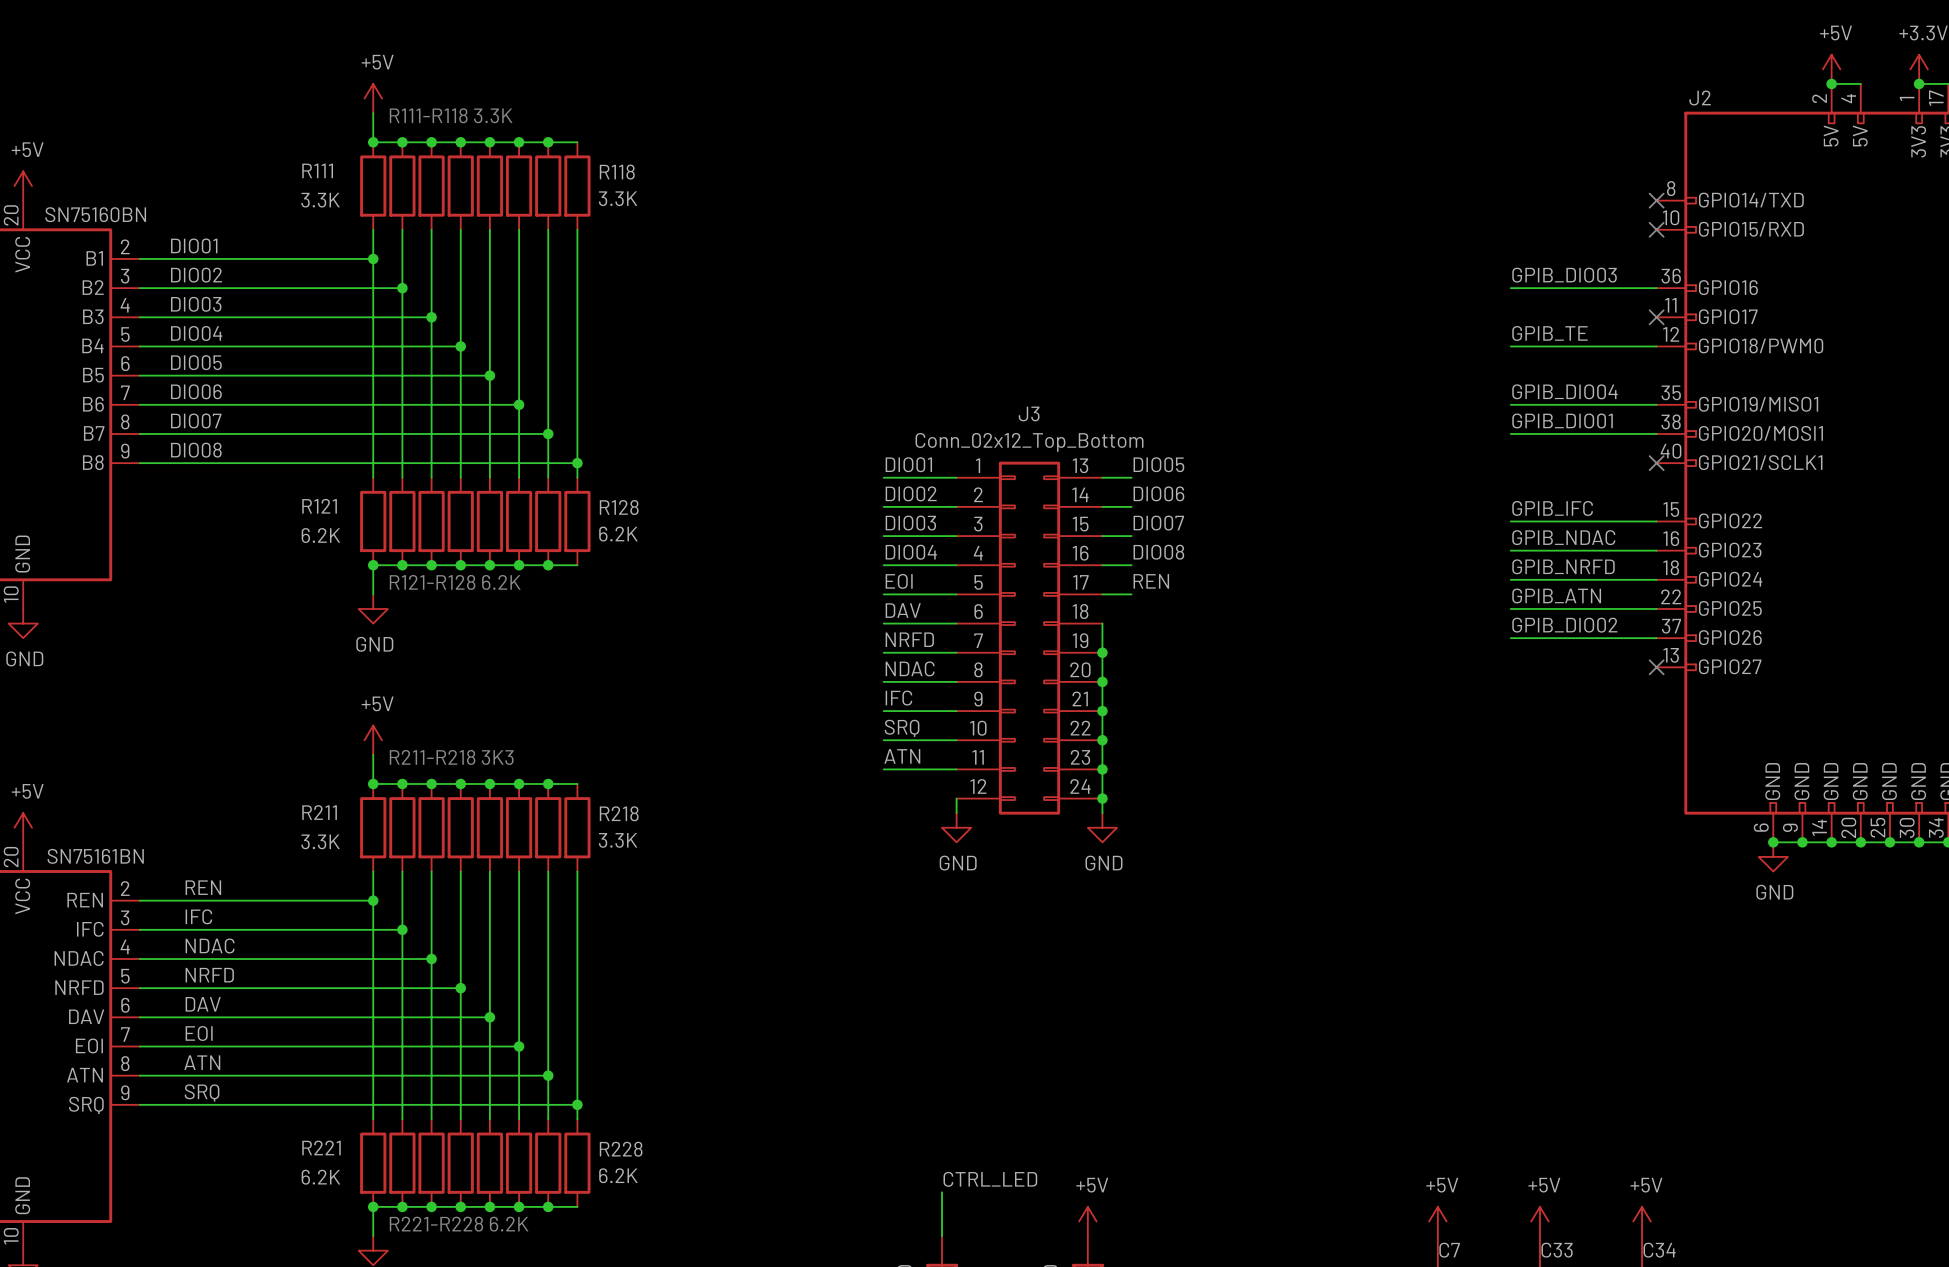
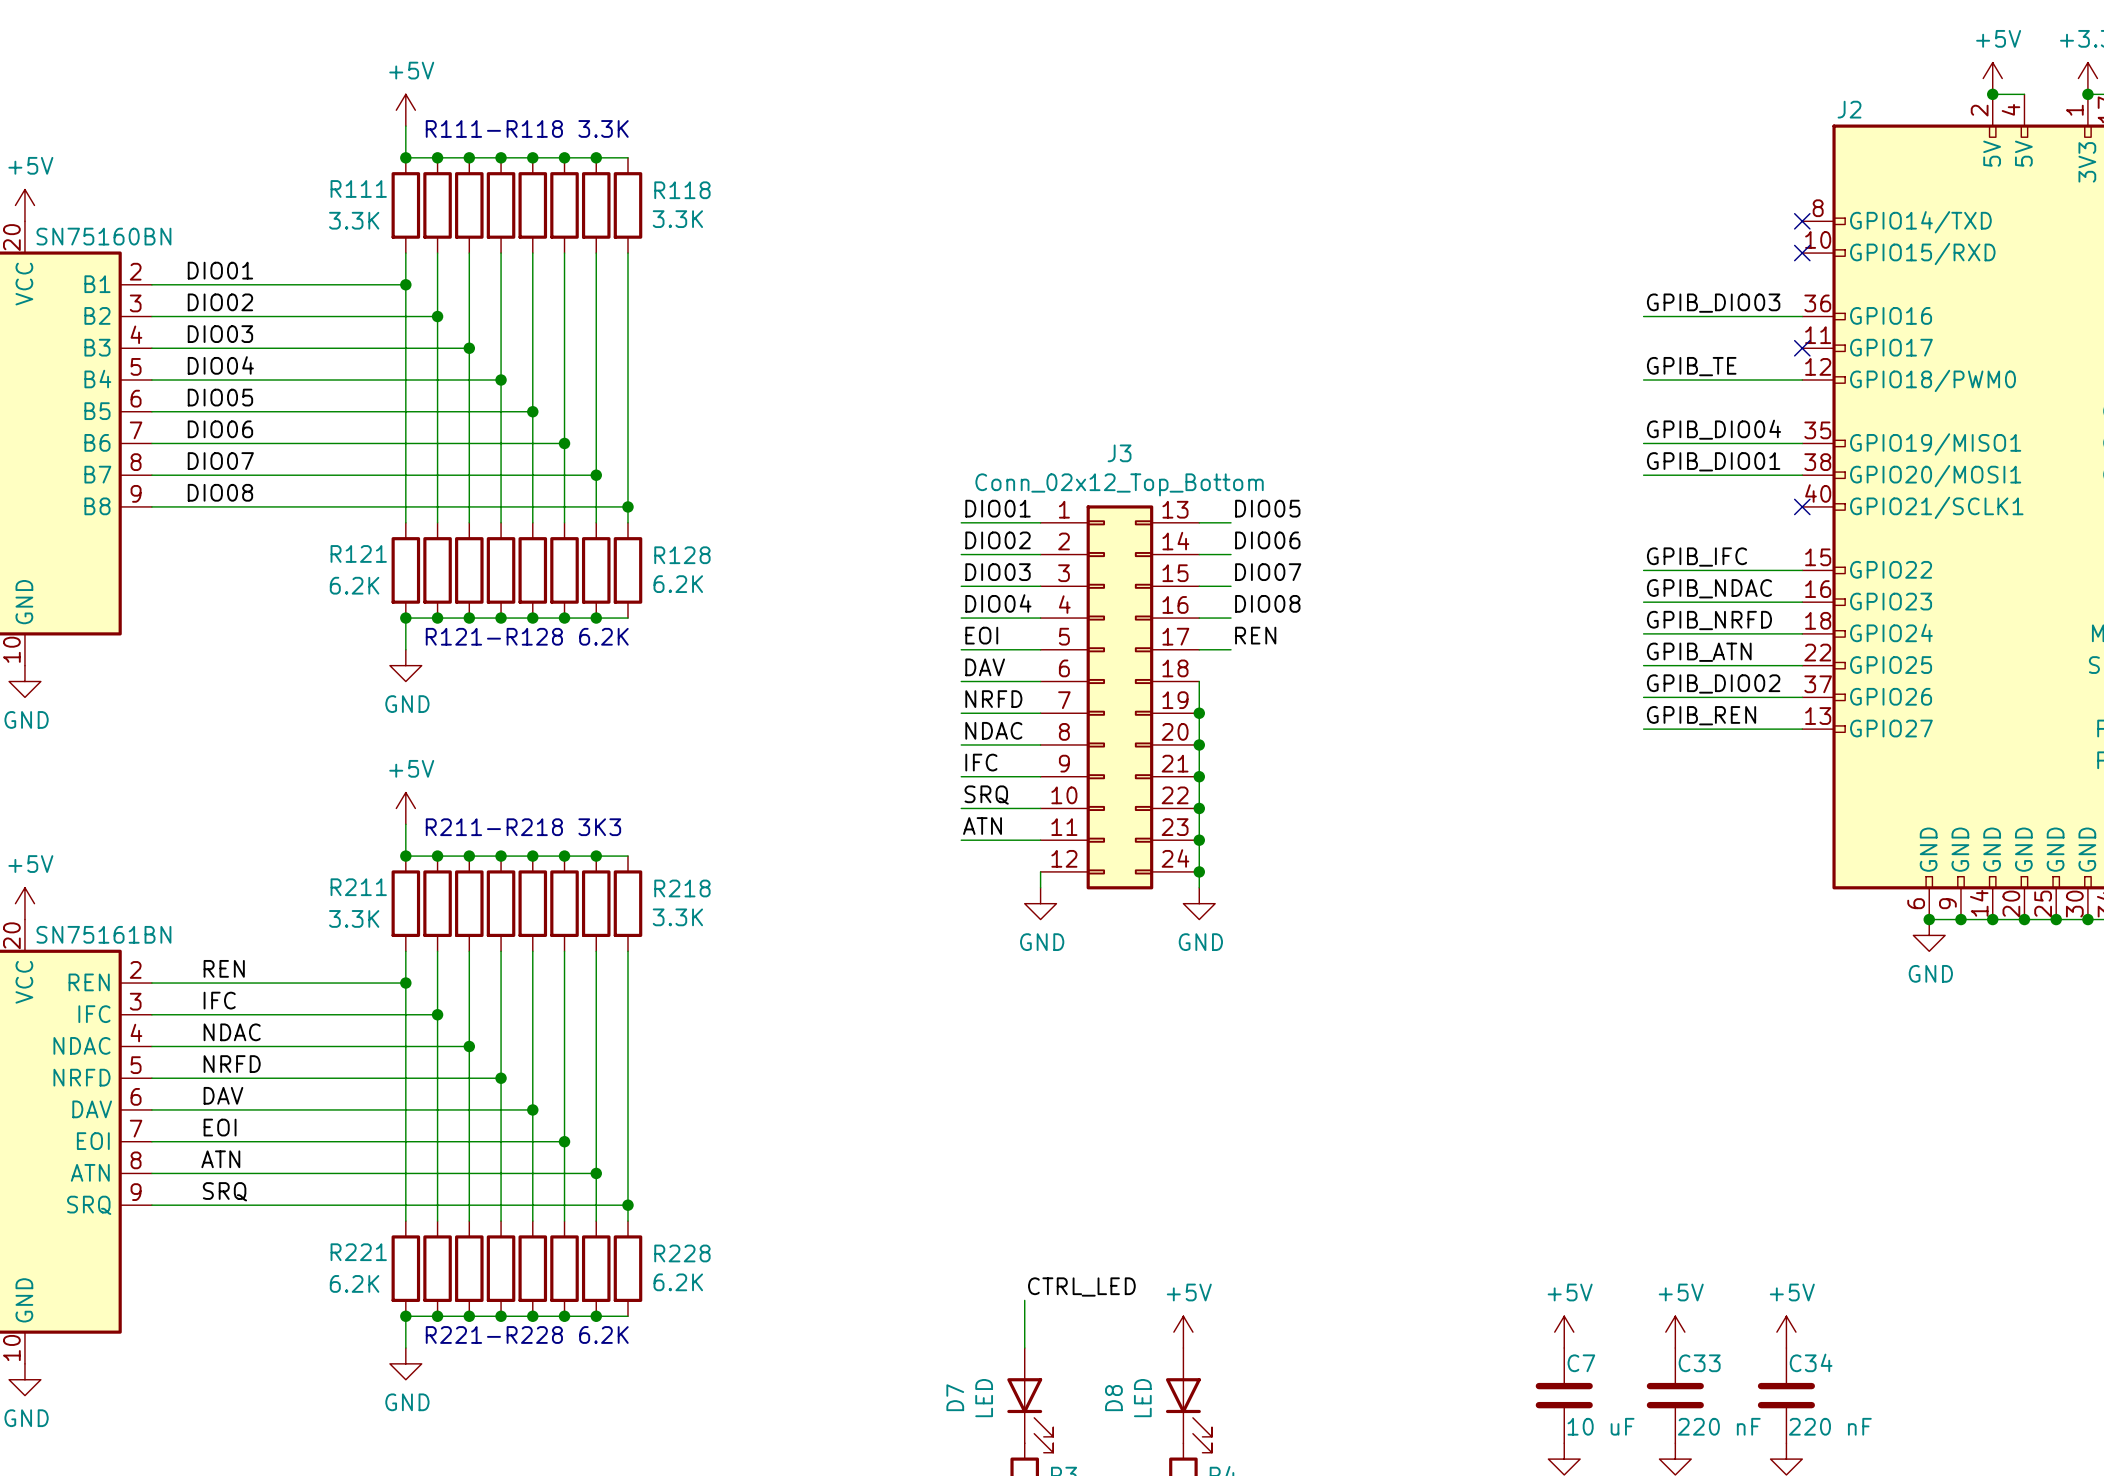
label: none -> GPIB_REN (1701, 715)
wire: none -> (1643, 729) (1802, 729)
no-connect mark: (1656, 667) -> none

